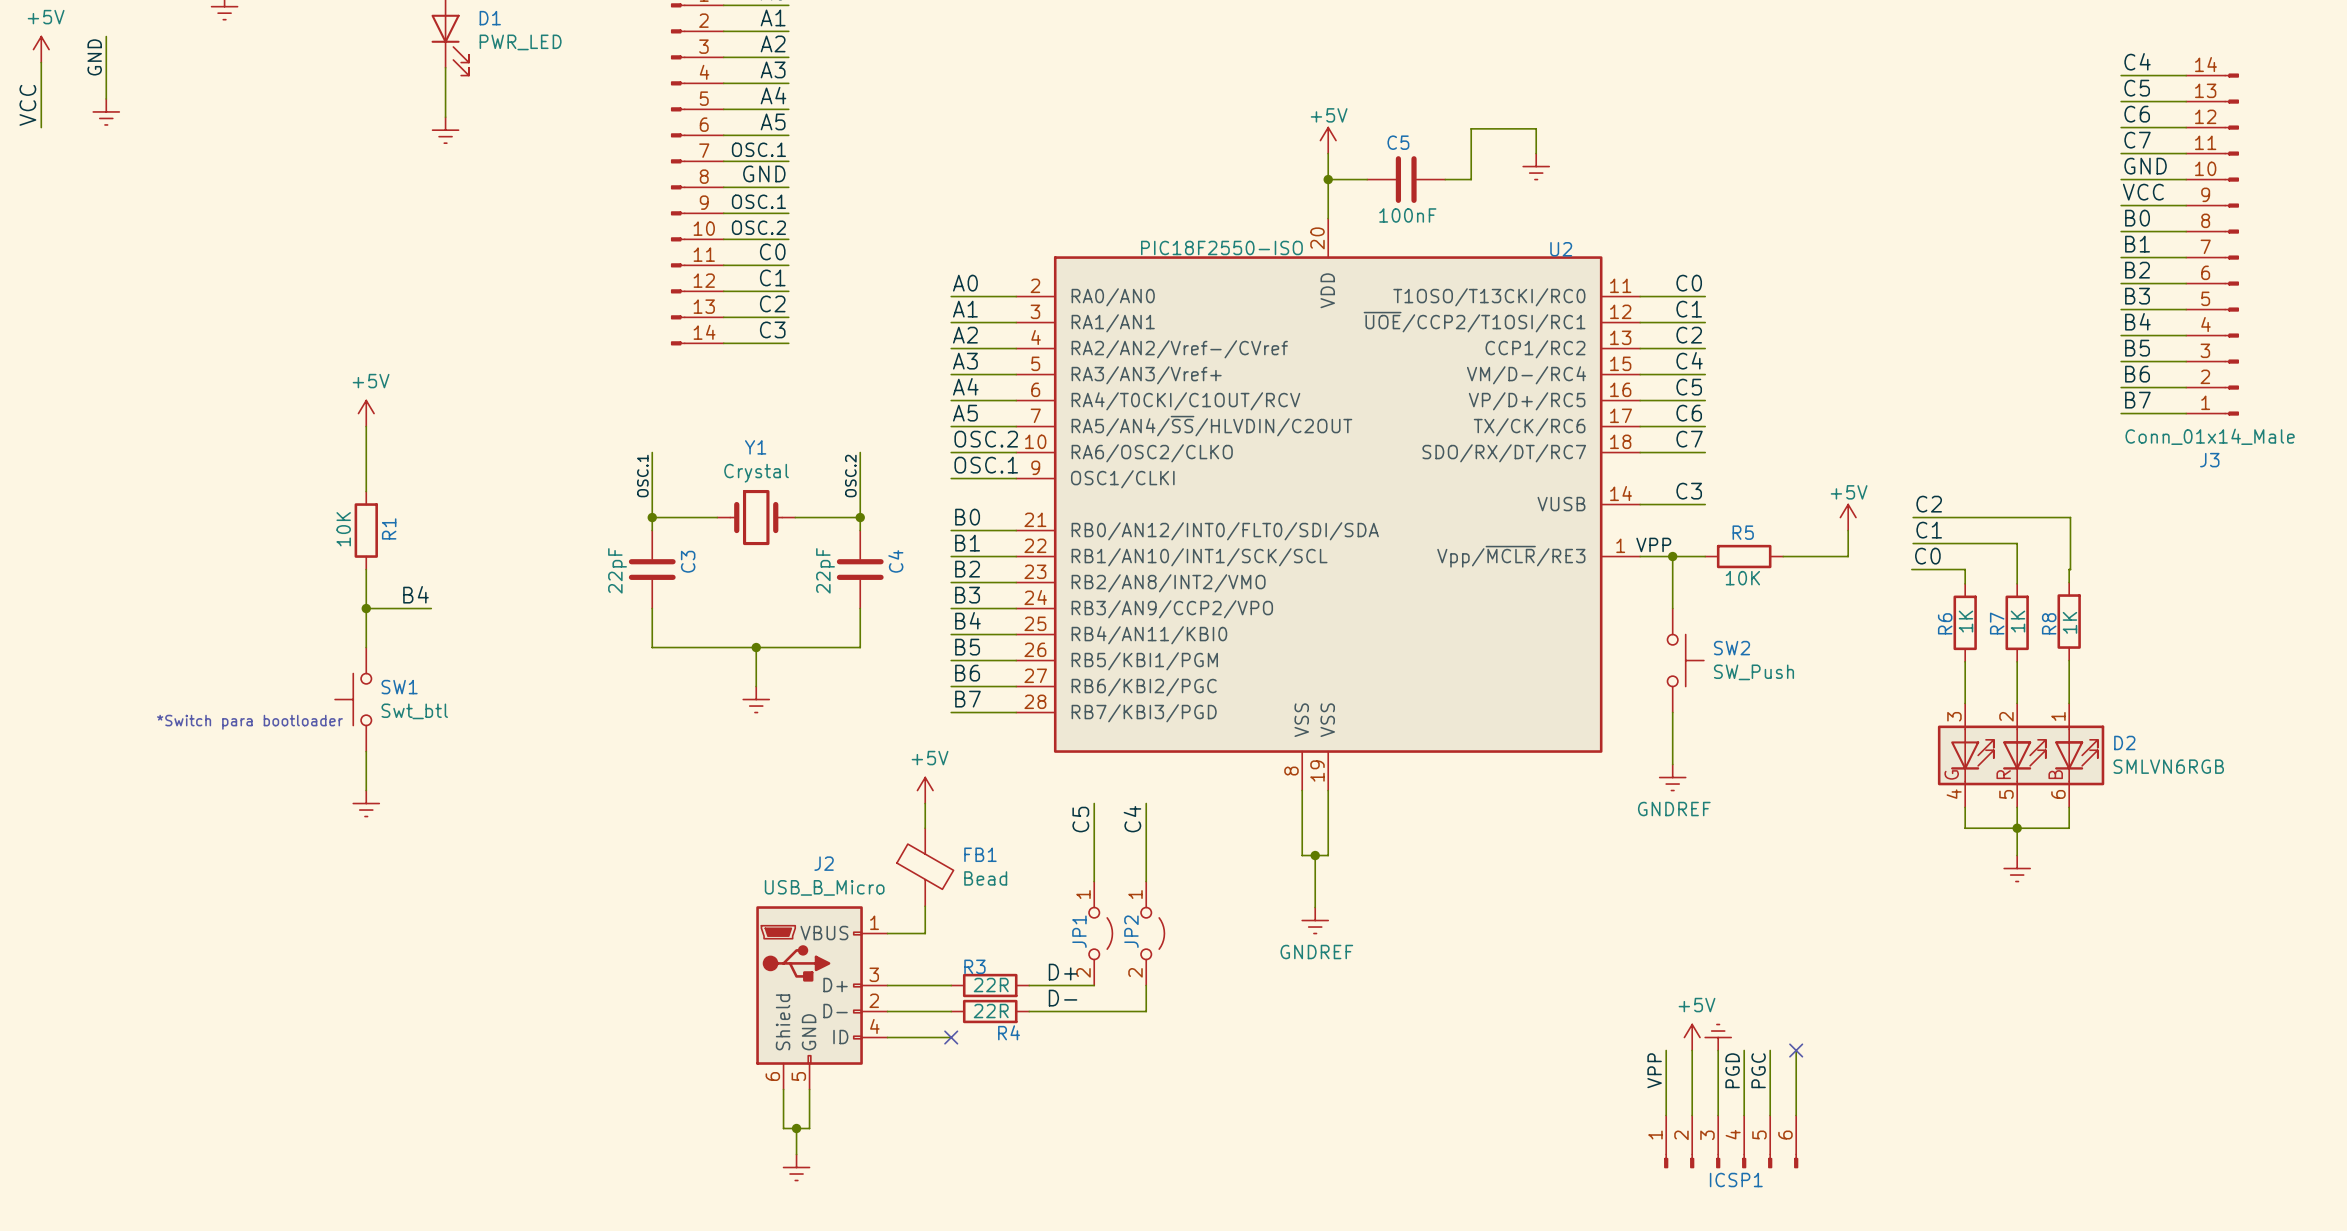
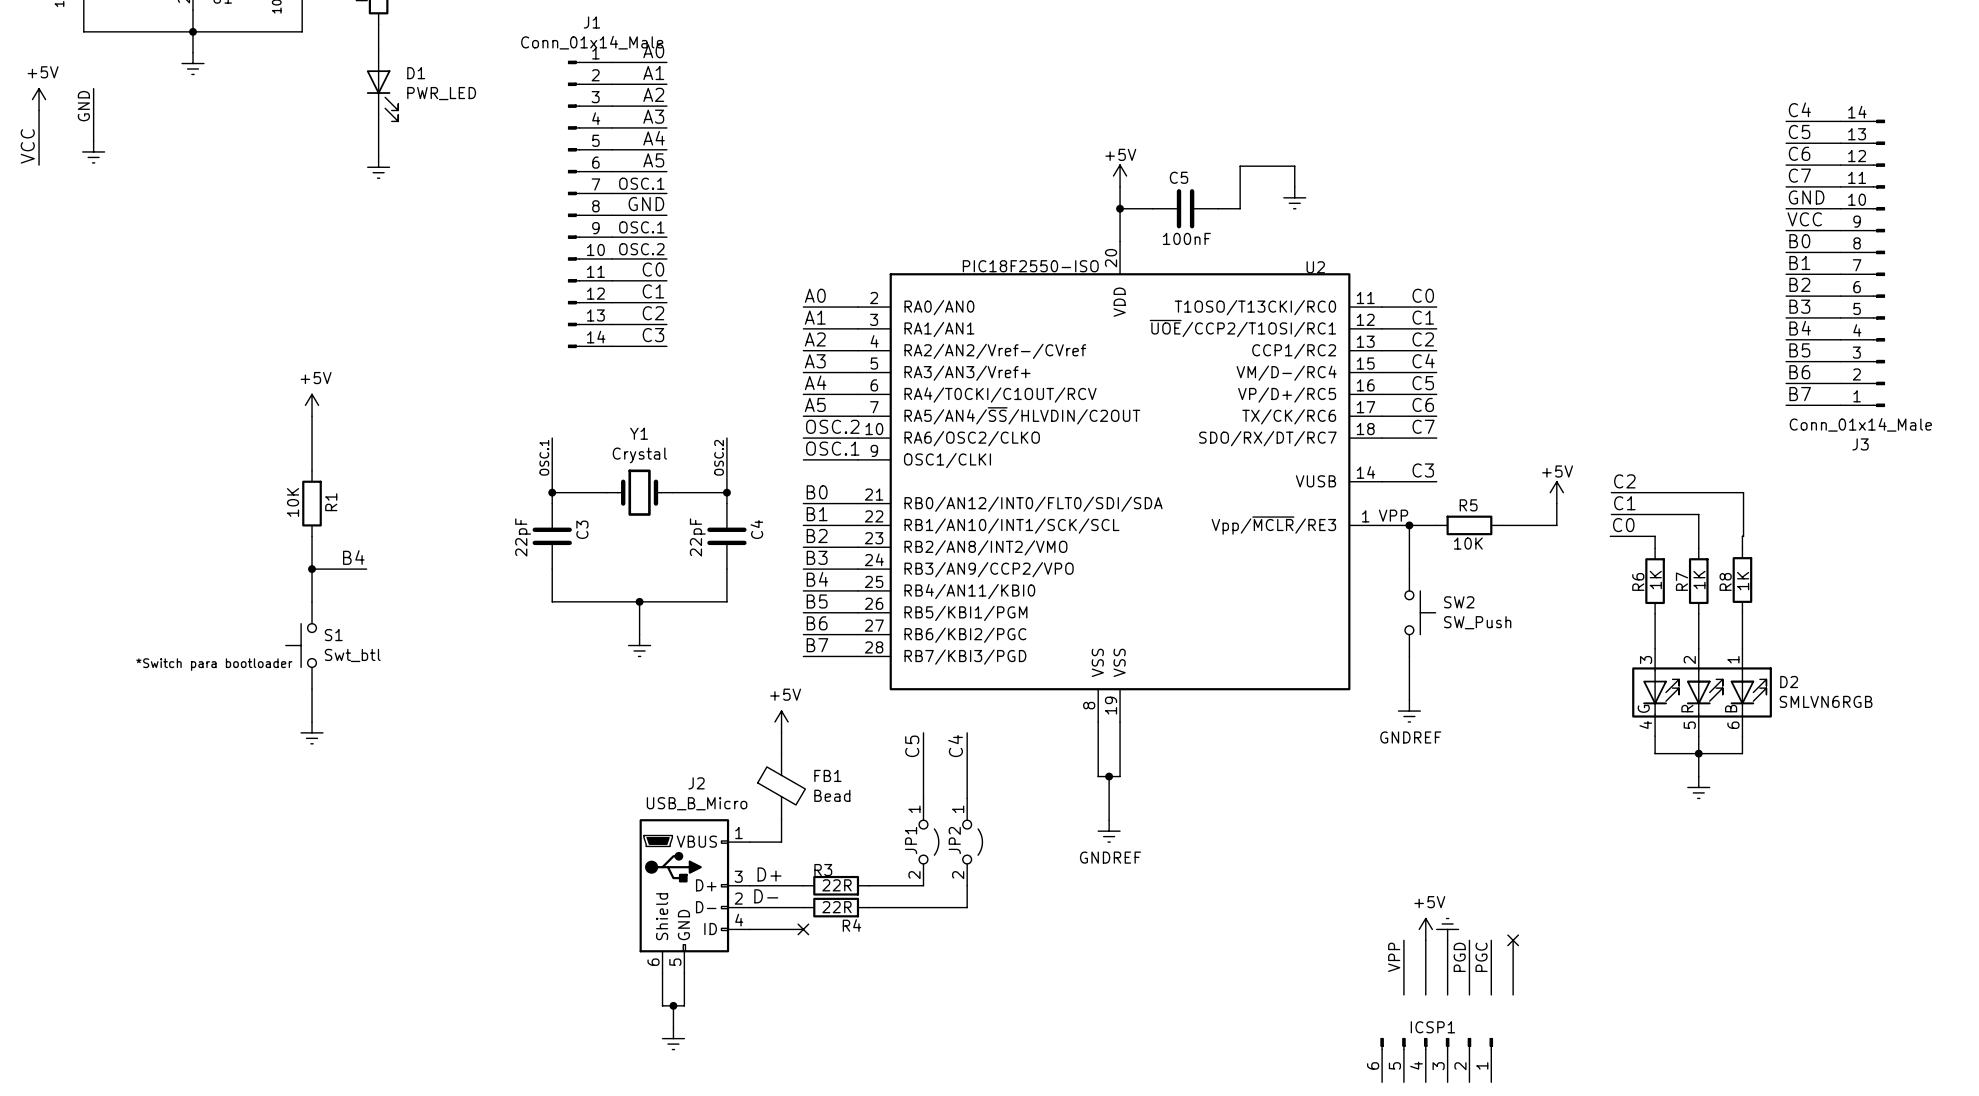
SW1 name: SW1 (399, 687) -> S1 (333, 635)
label position: D+ (1063, 972) -> D+ (769, 874)
label position: D- (1063, 998) -> D- (766, 896)
ICSP1 rotation: 0° (1731, 1161) -> 180° (1436, 1044)

